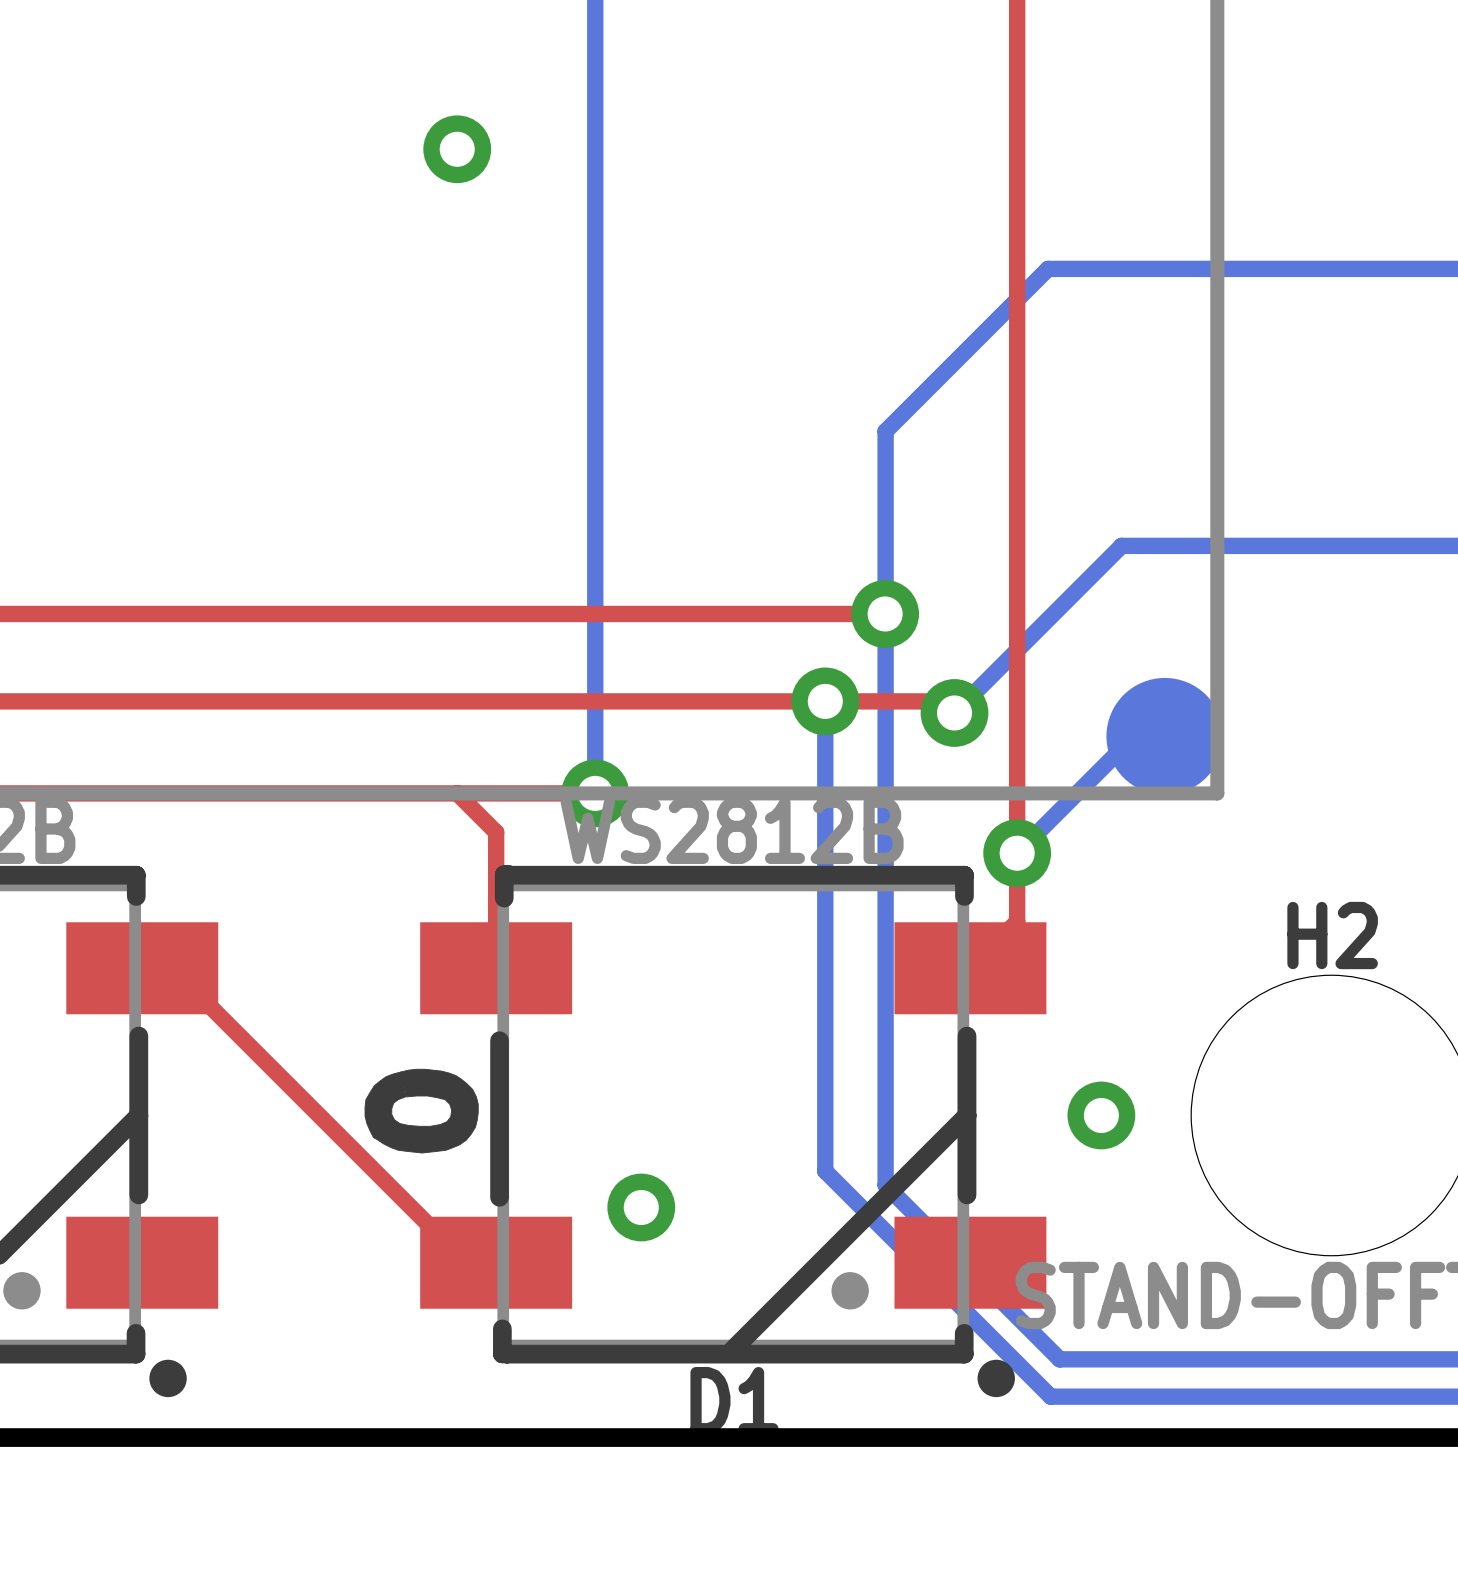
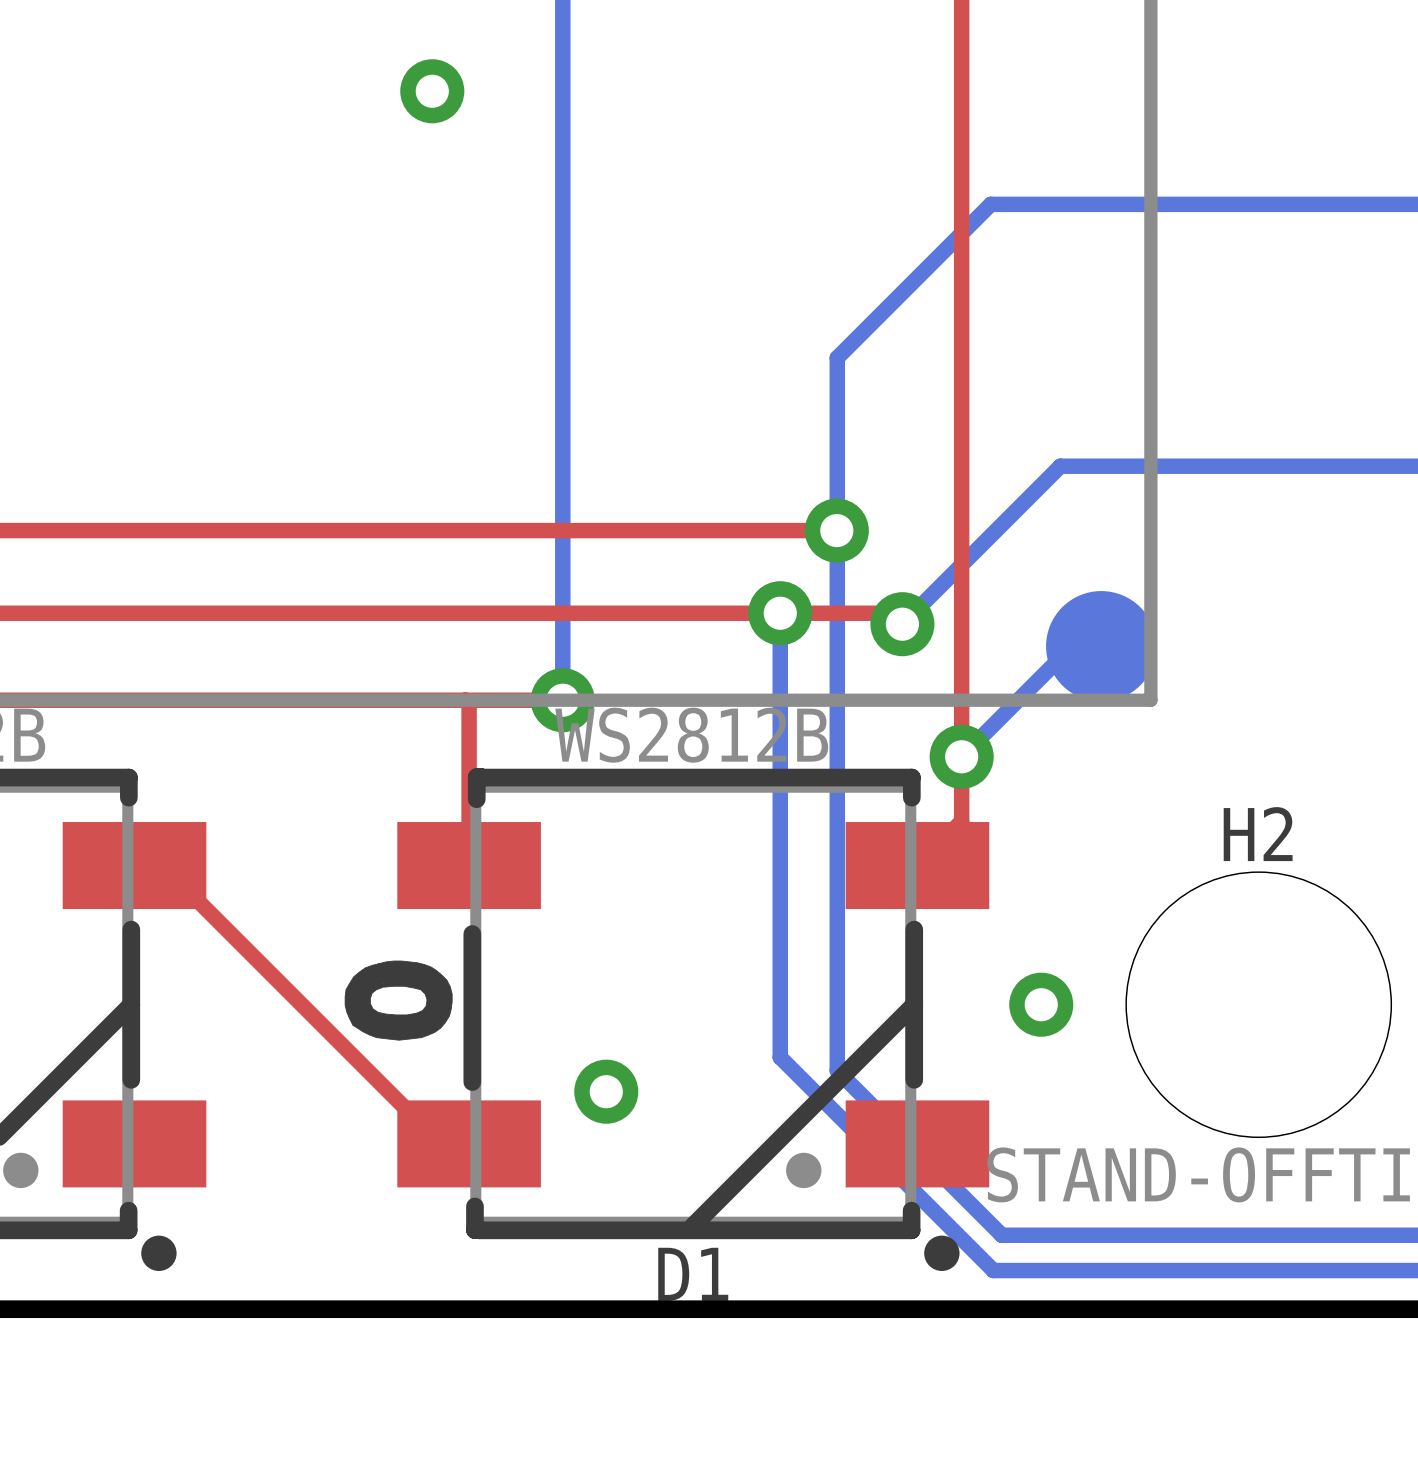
top track: (457, 793) (496, 832) -> (465, 700) (469, 703) (469, 737)

